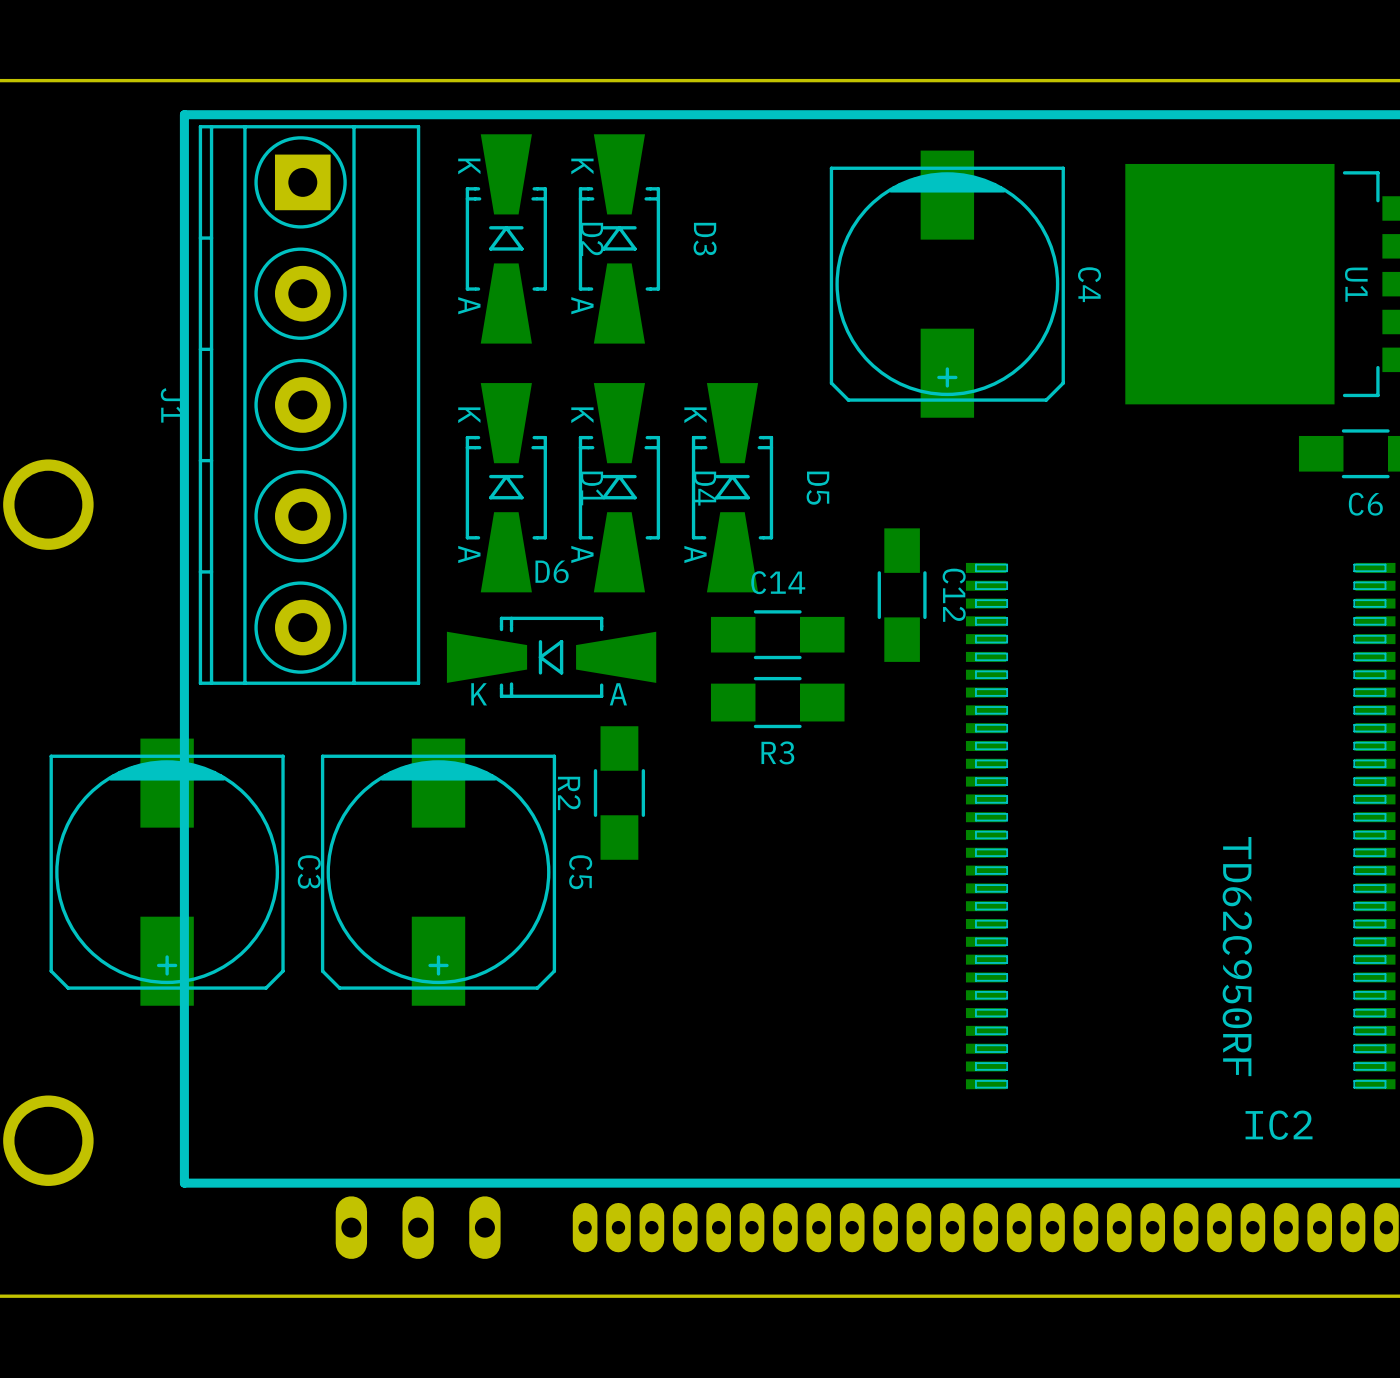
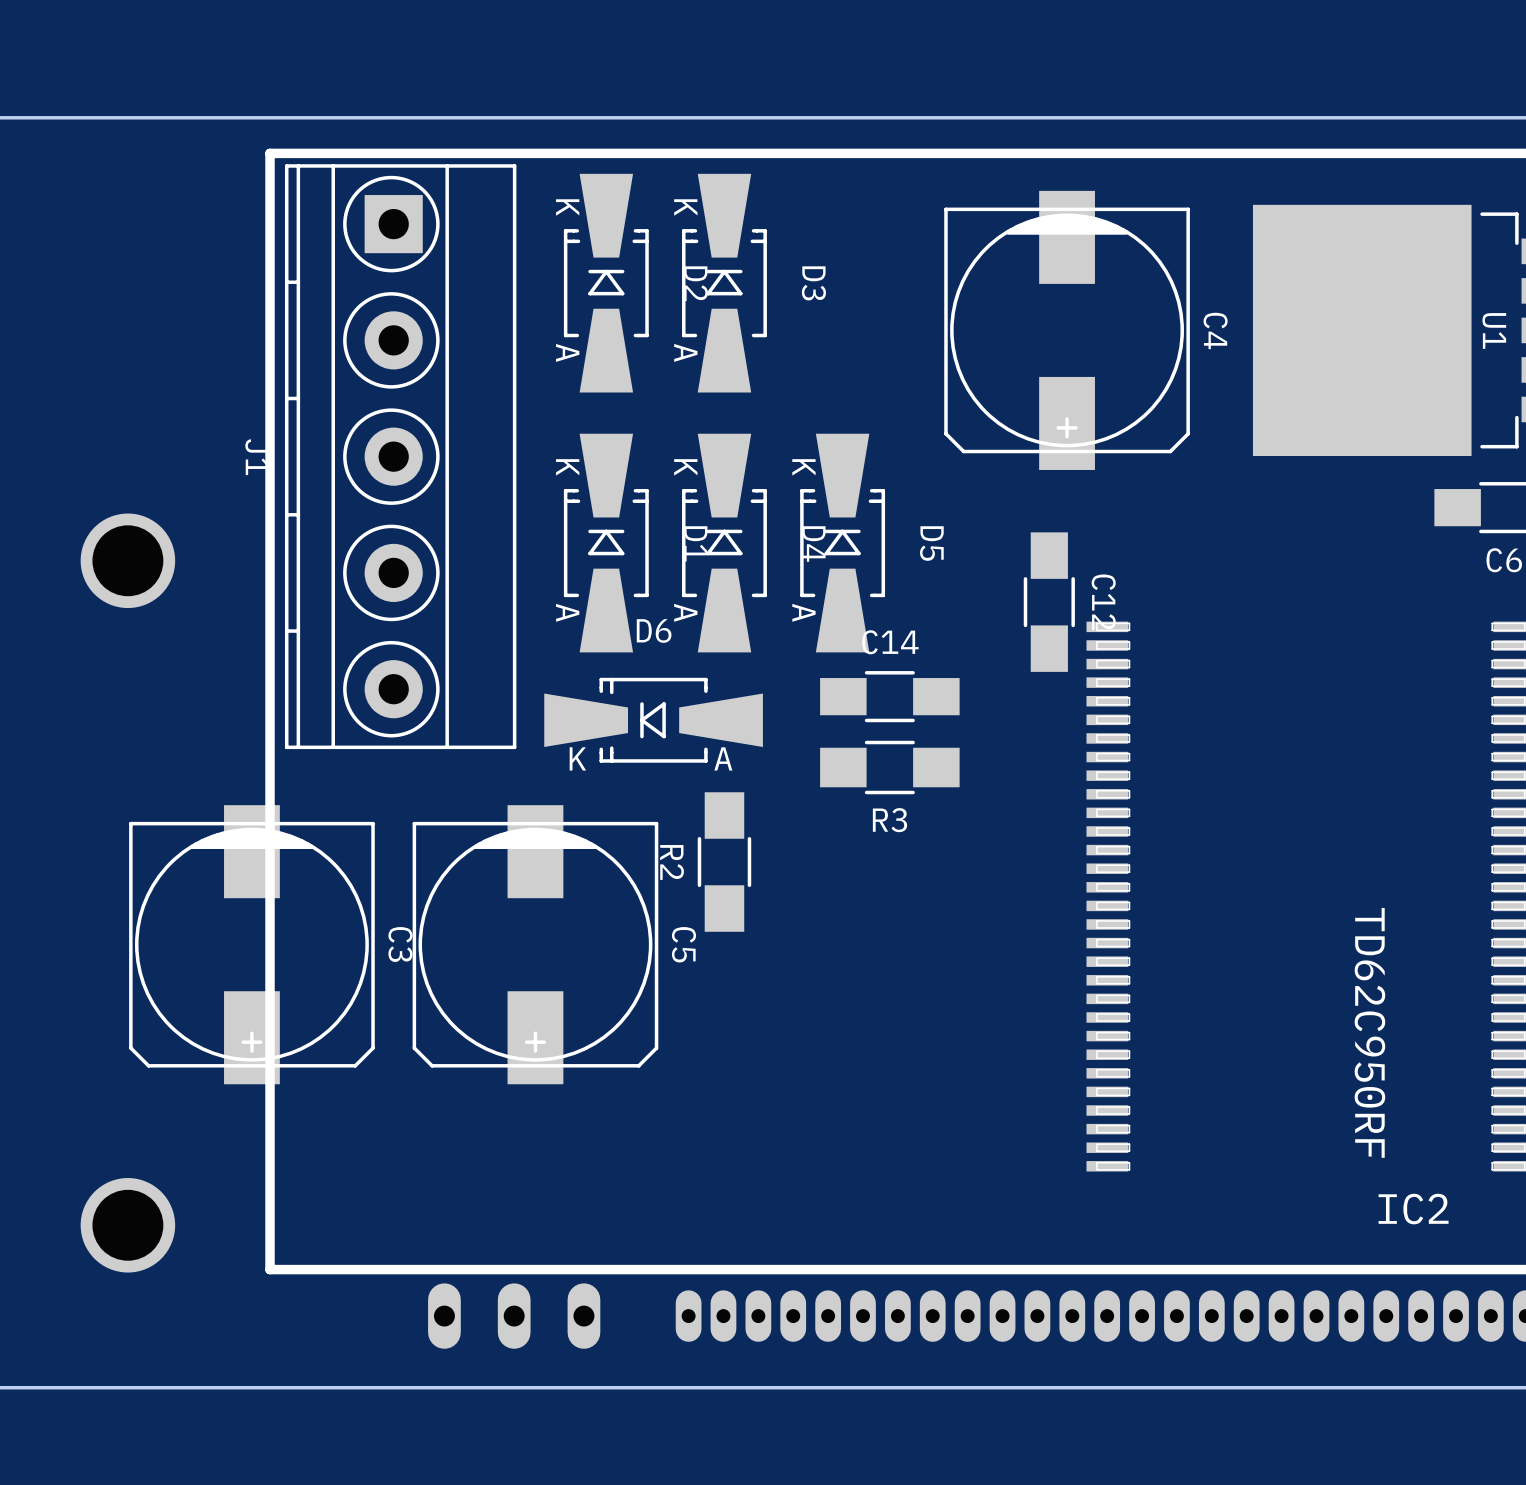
C12 position: (902, 595) -> (1049, 602)

